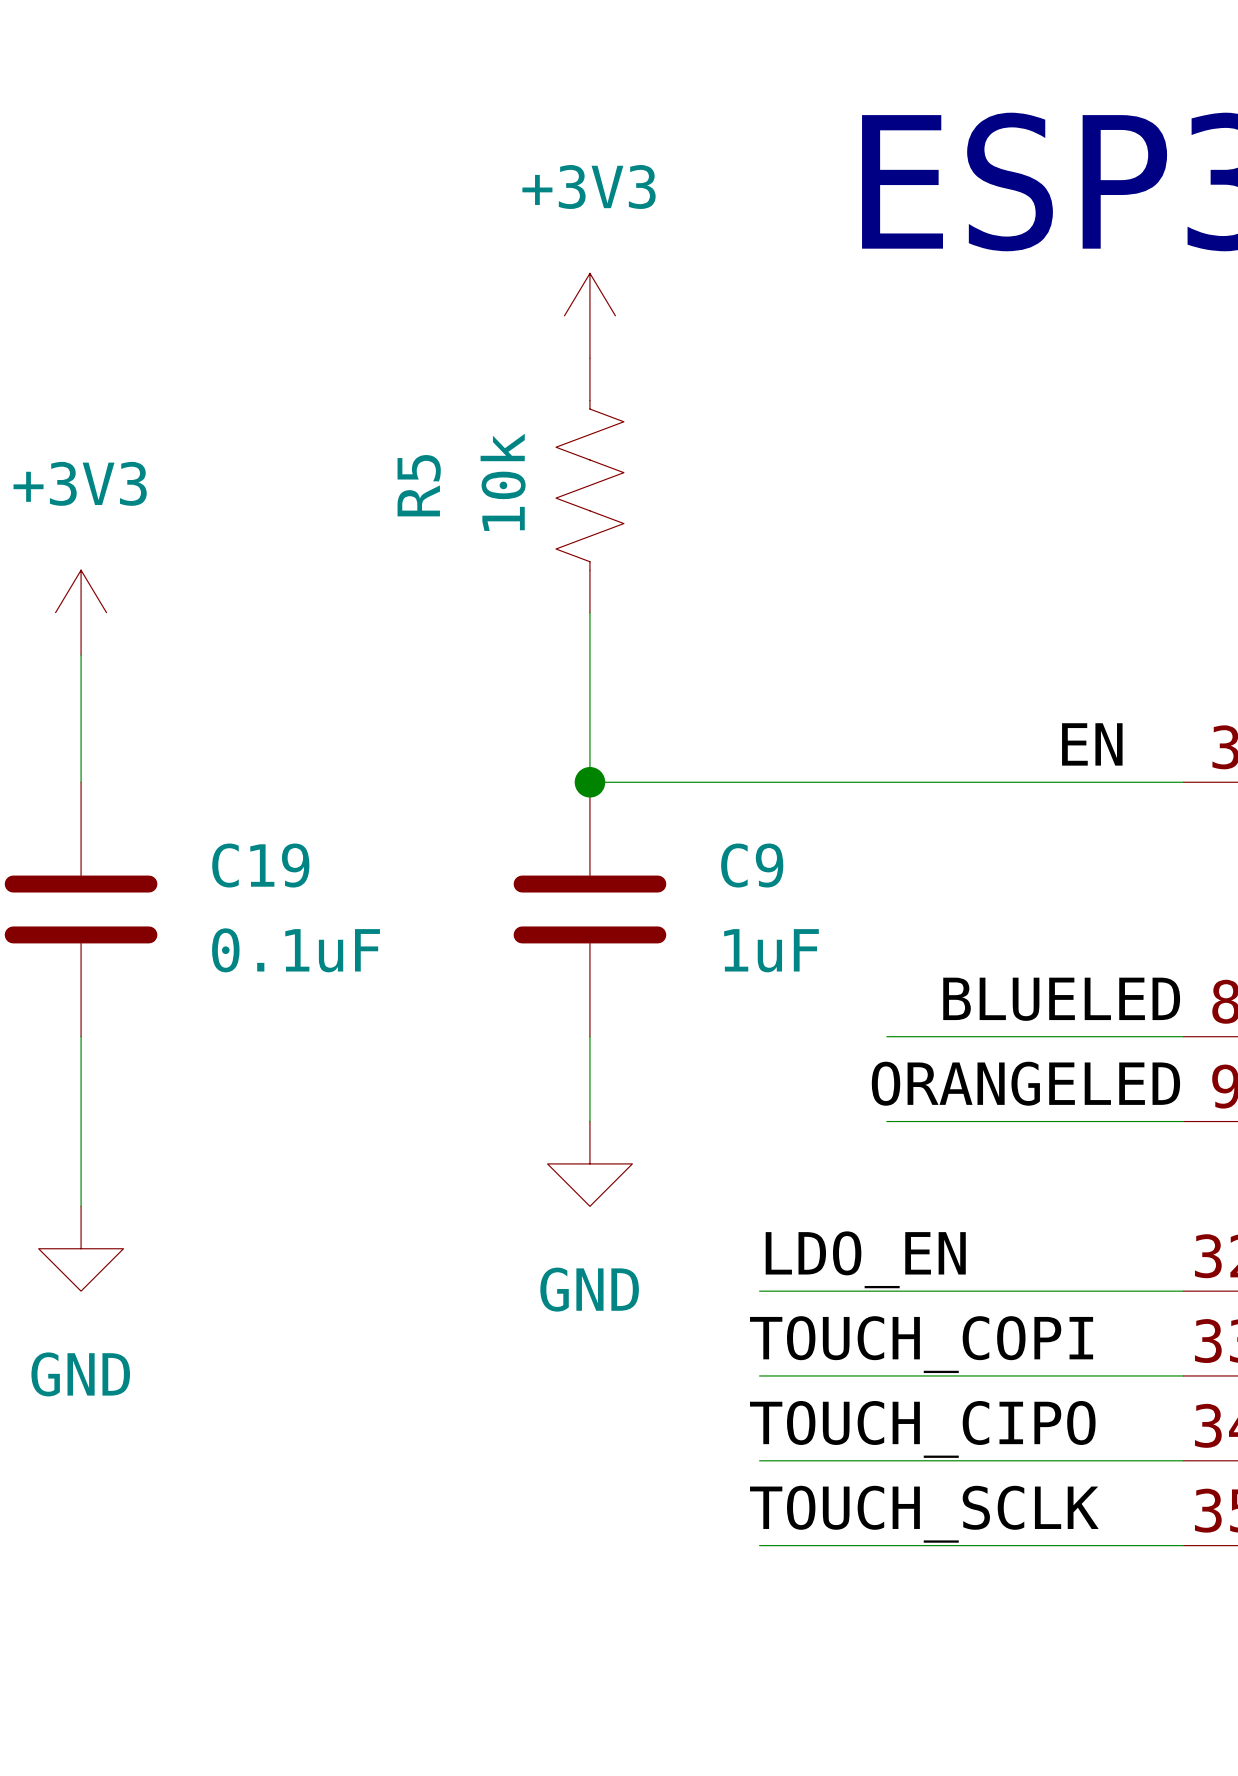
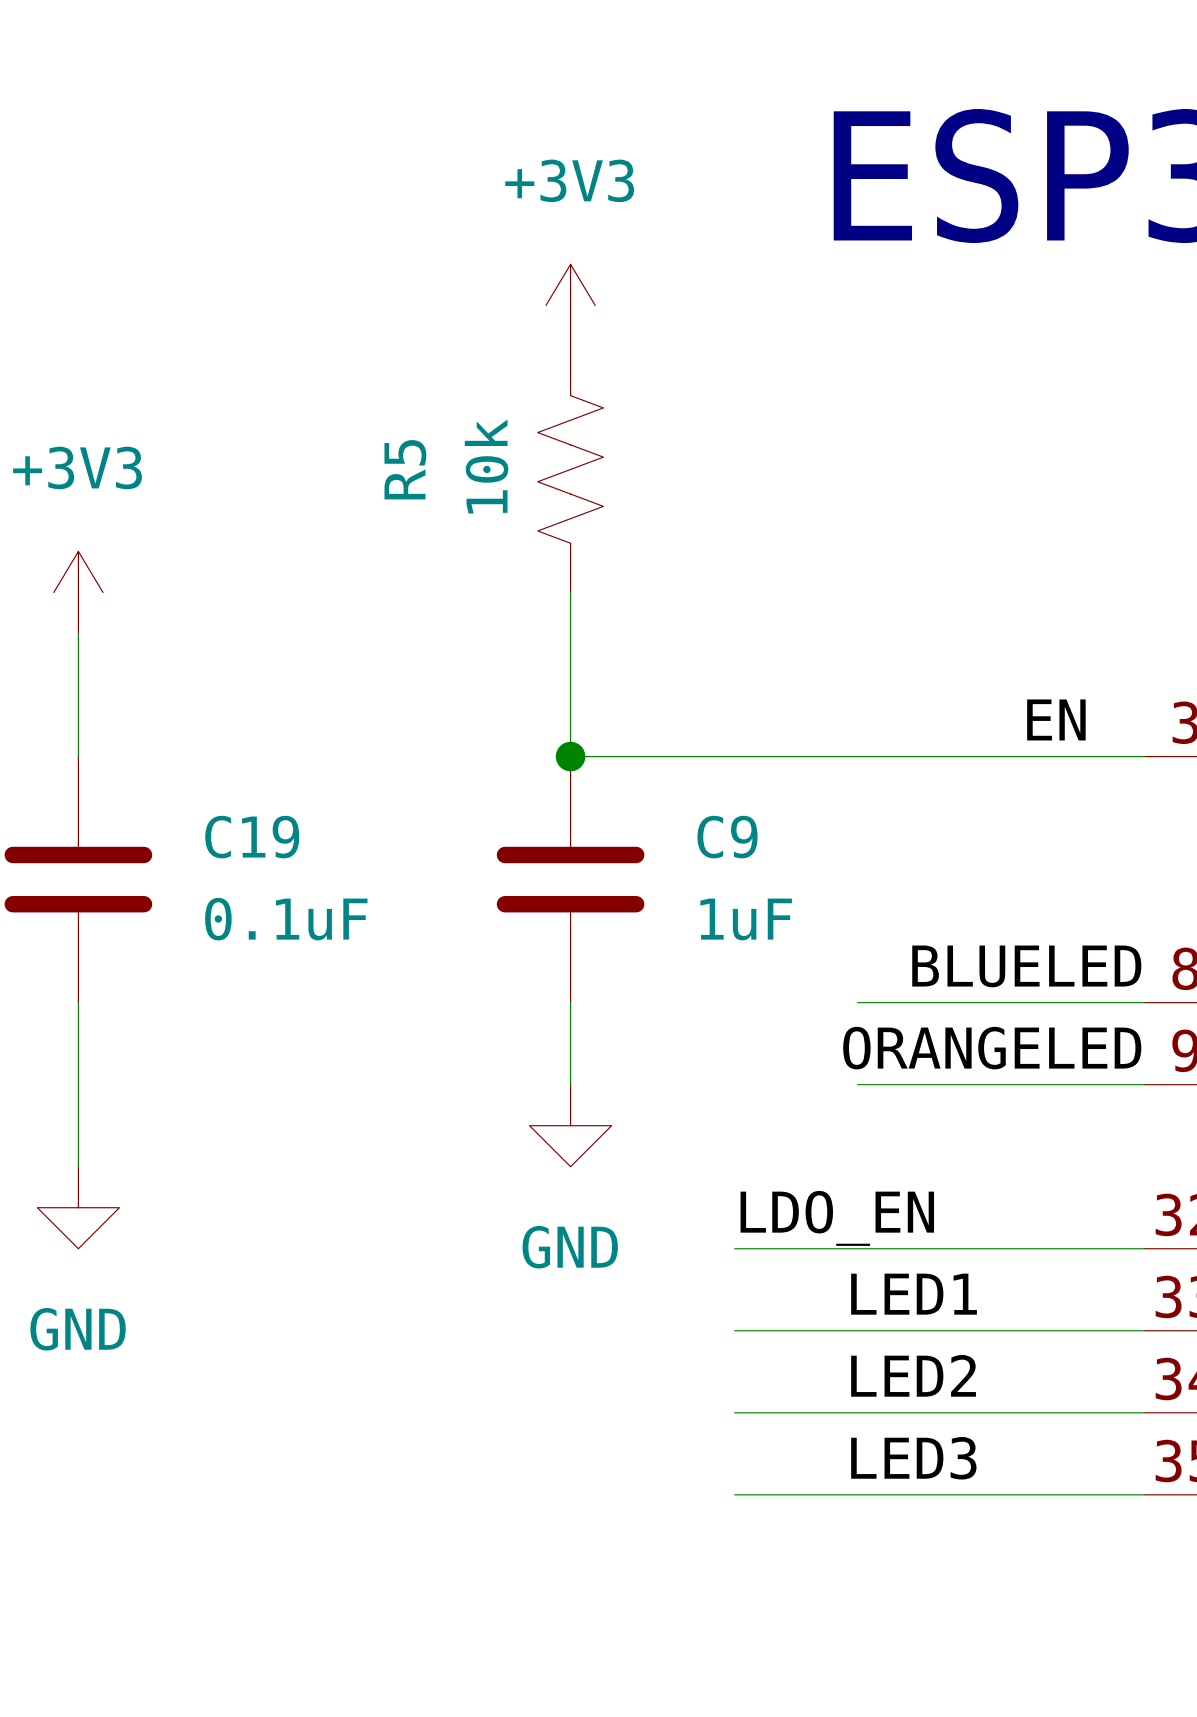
label: none -> LED1 (914, 1294)
label: TOUCH_COPI (921, 1344) -> none
label: none -> LED2 (913, 1375)
label: TOUCH_CIPO (922, 1429) -> none
label: none -> LED3 (913, 1458)
label: TOUCH_SCLK (924, 1514) -> none

